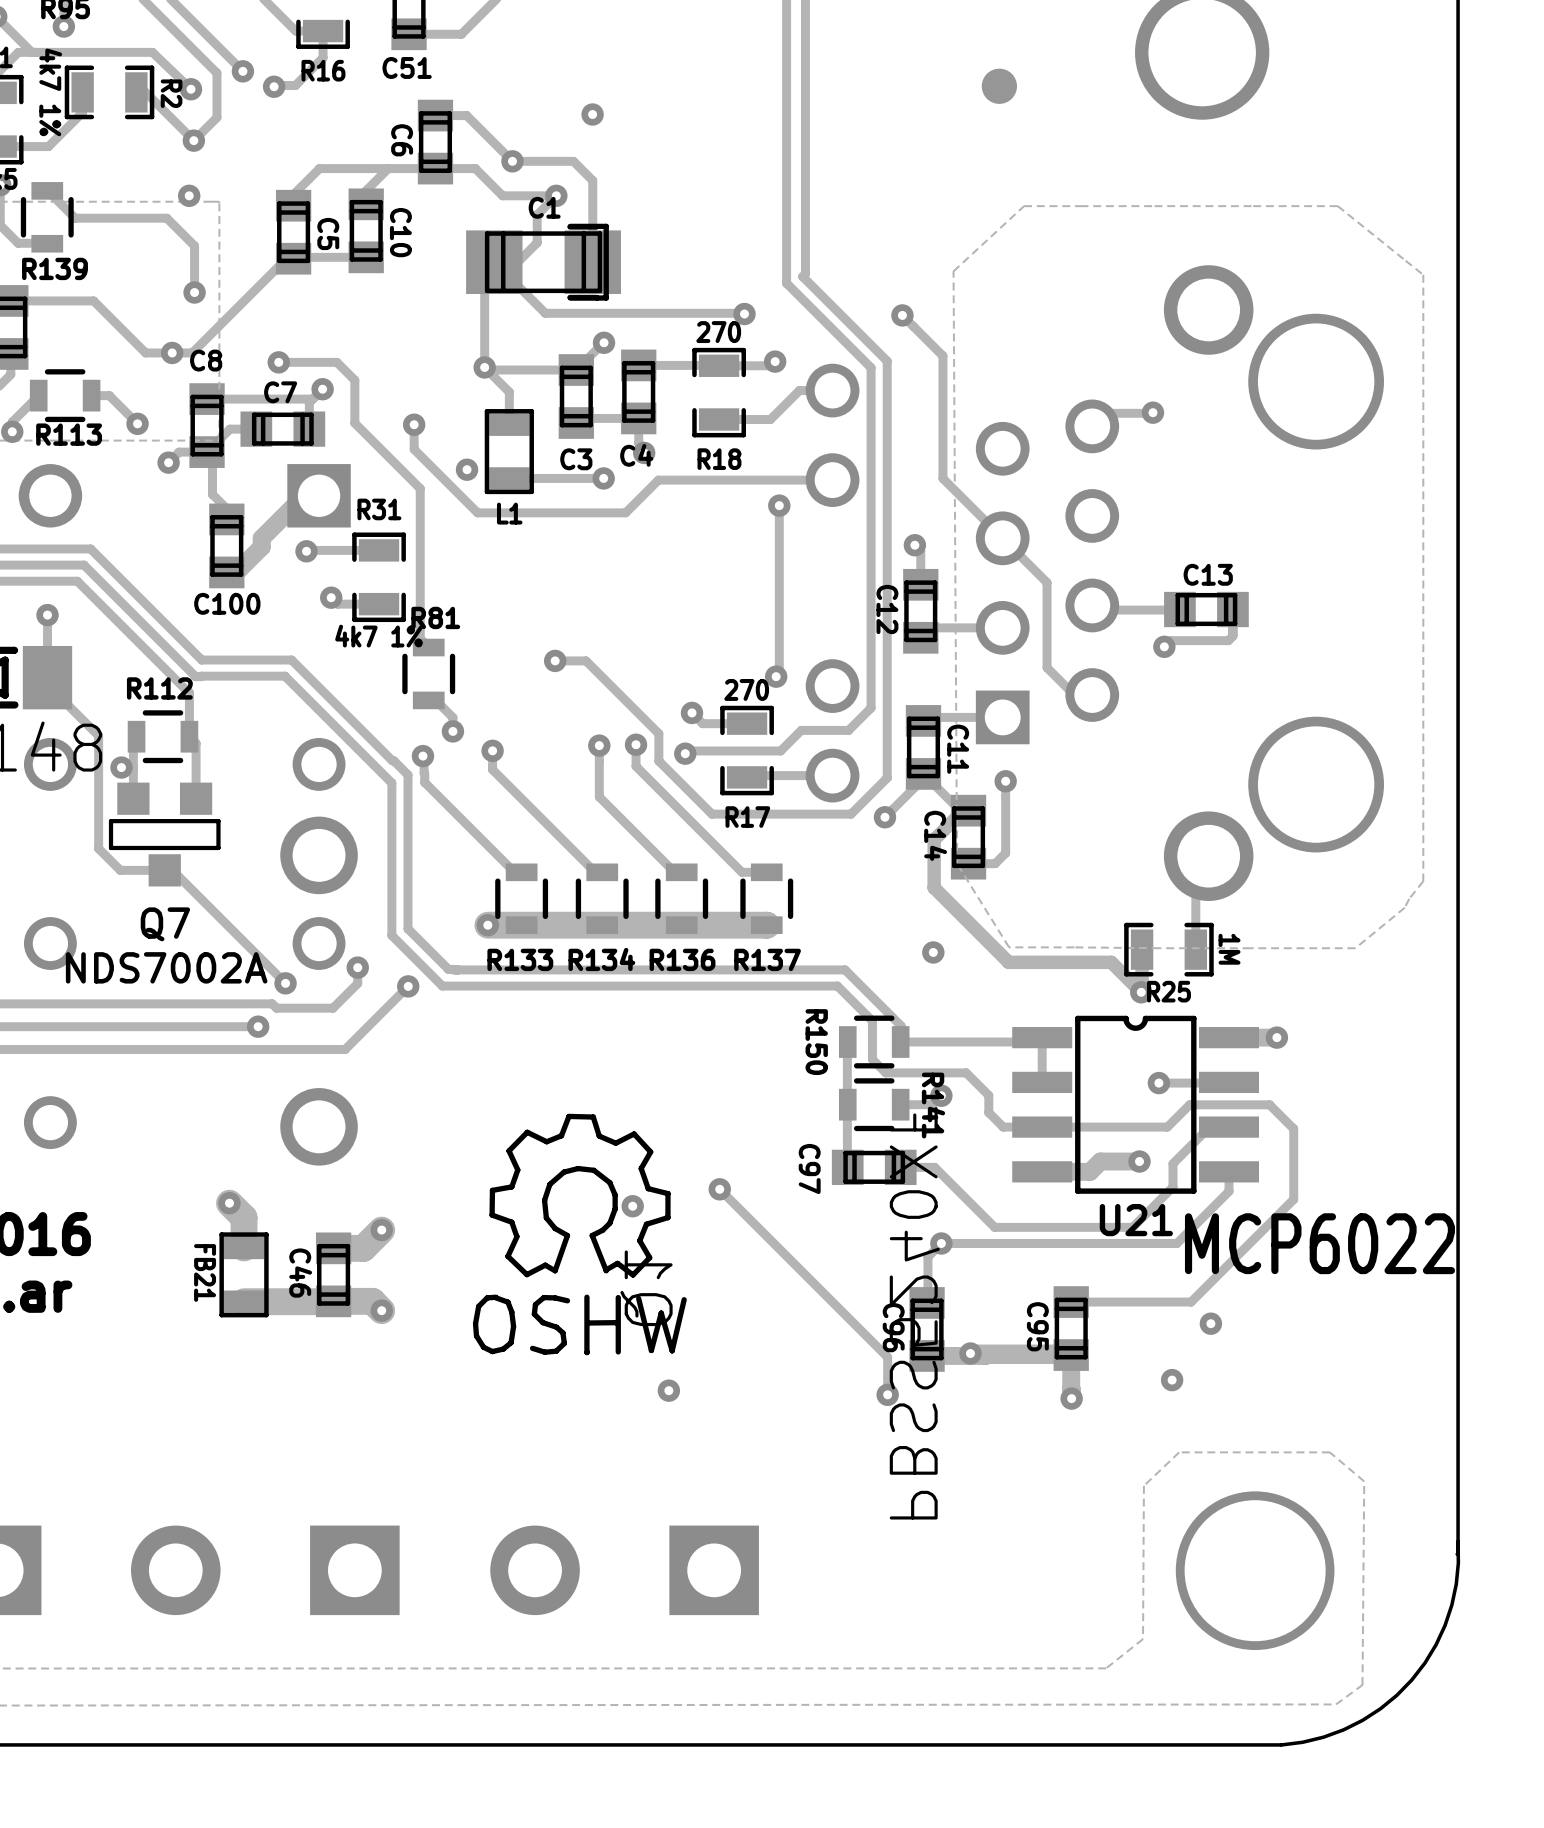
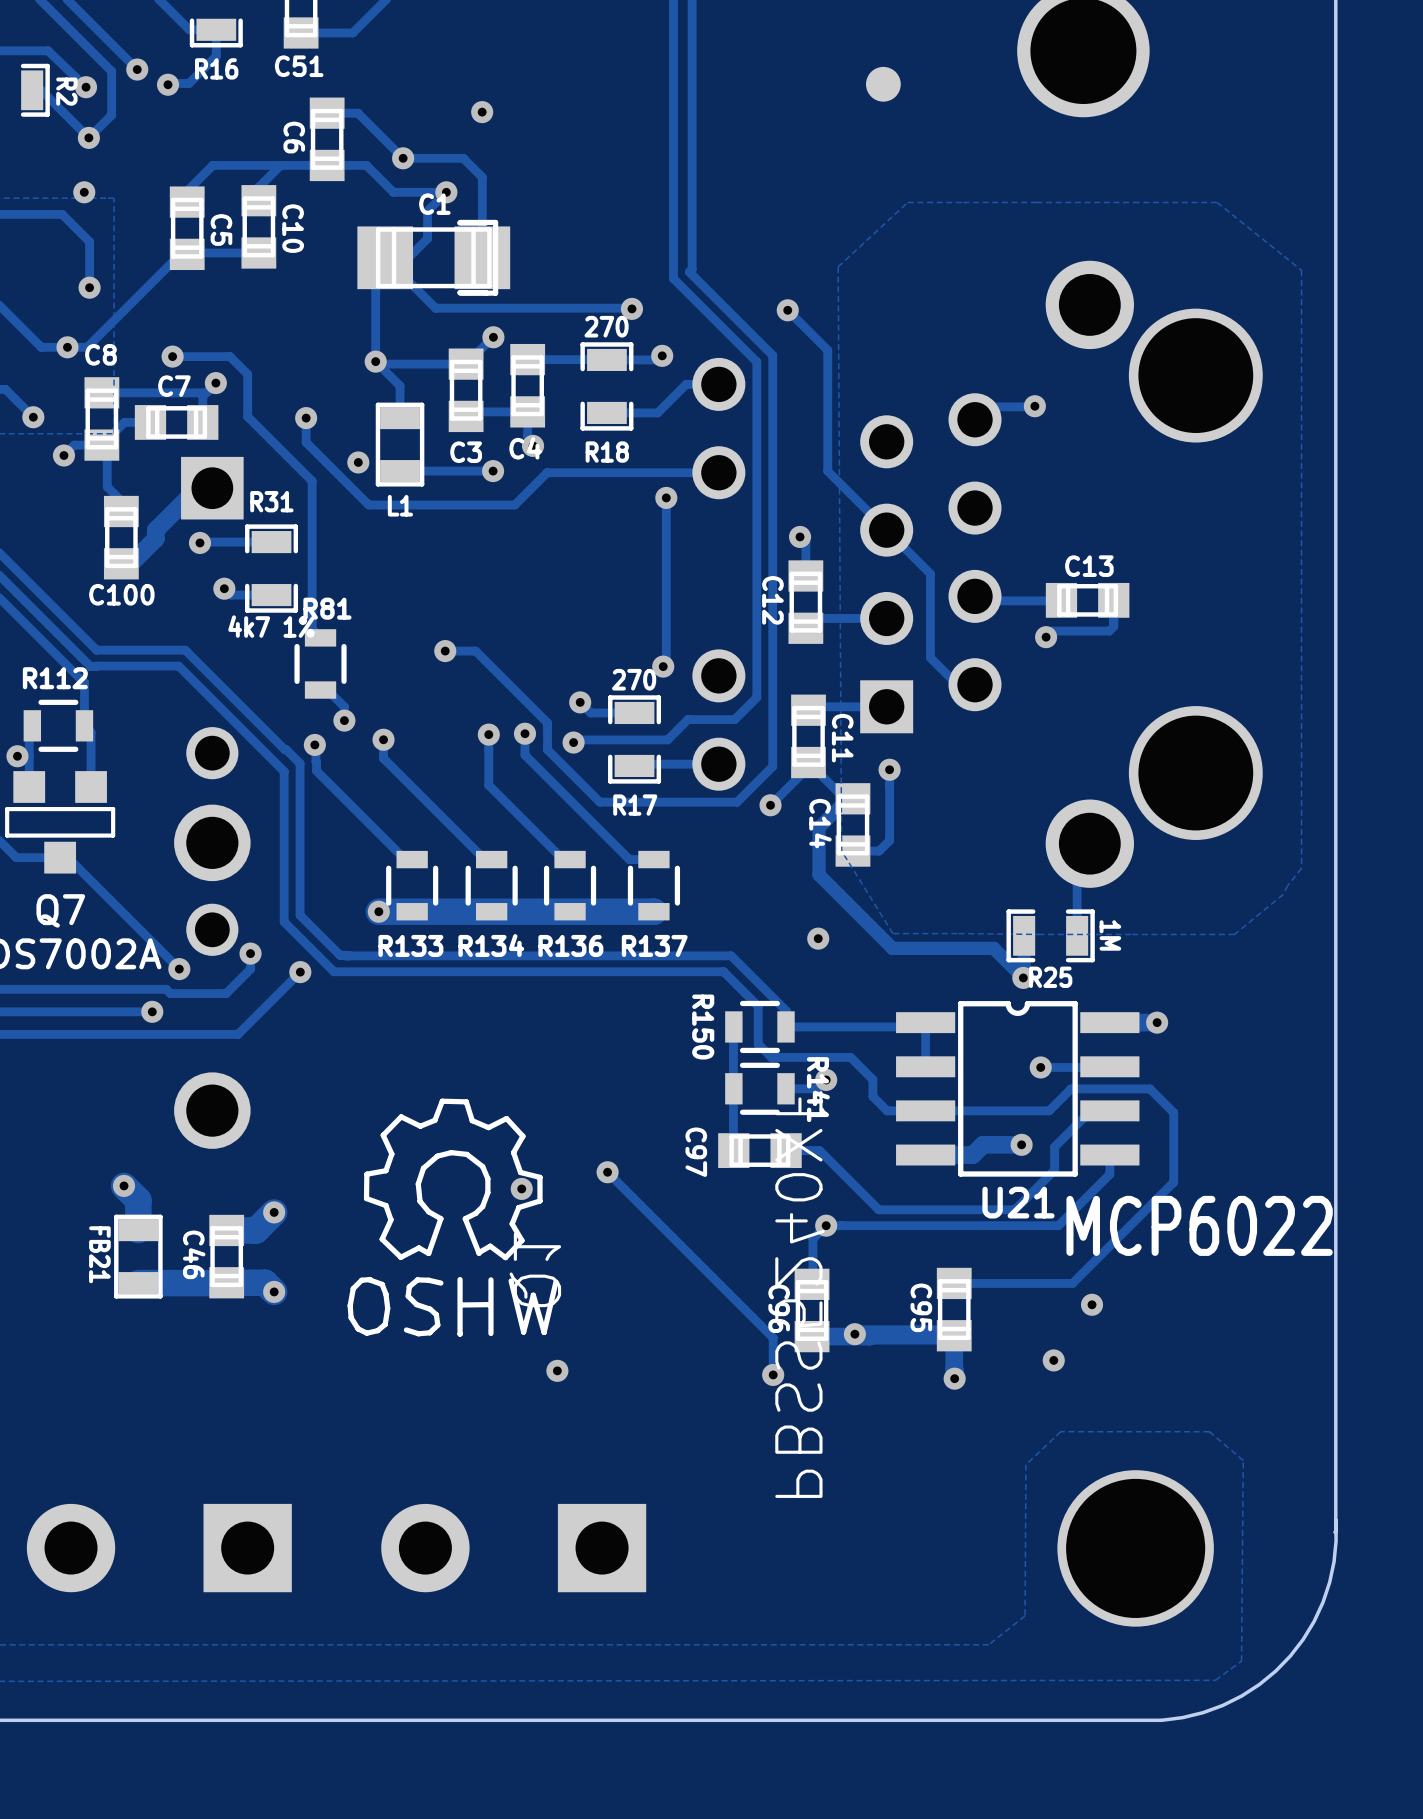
drawing position: (579, 1234) -> (453, 1217)

